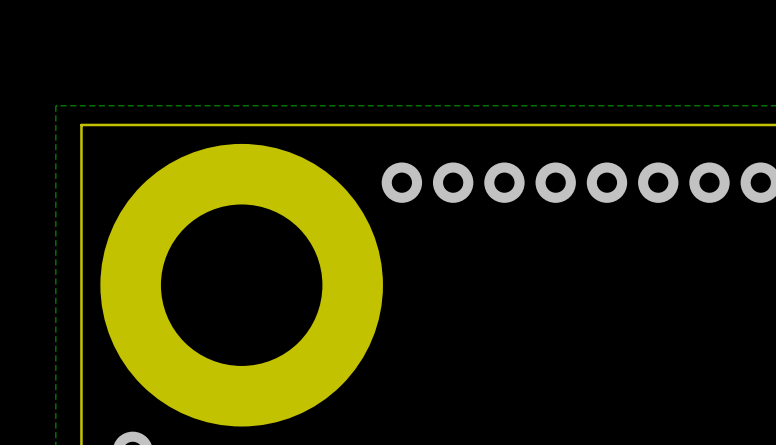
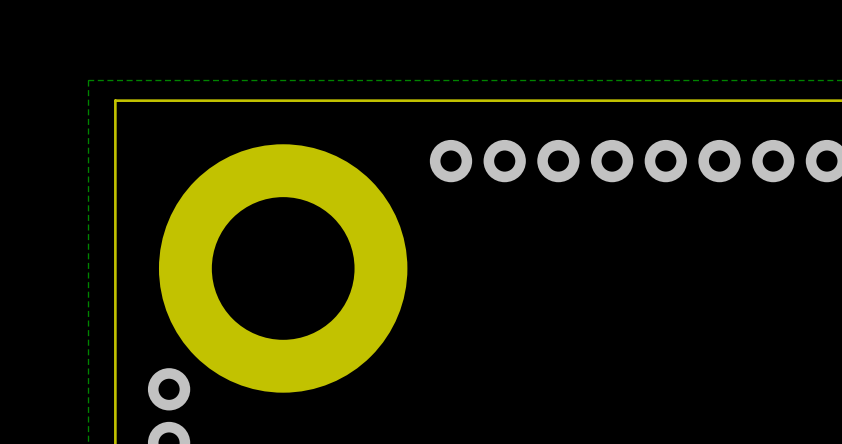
part footprint: [100, 143, 383, 427] -> [158, 144, 408, 393]
via: none -> (169, 389)

